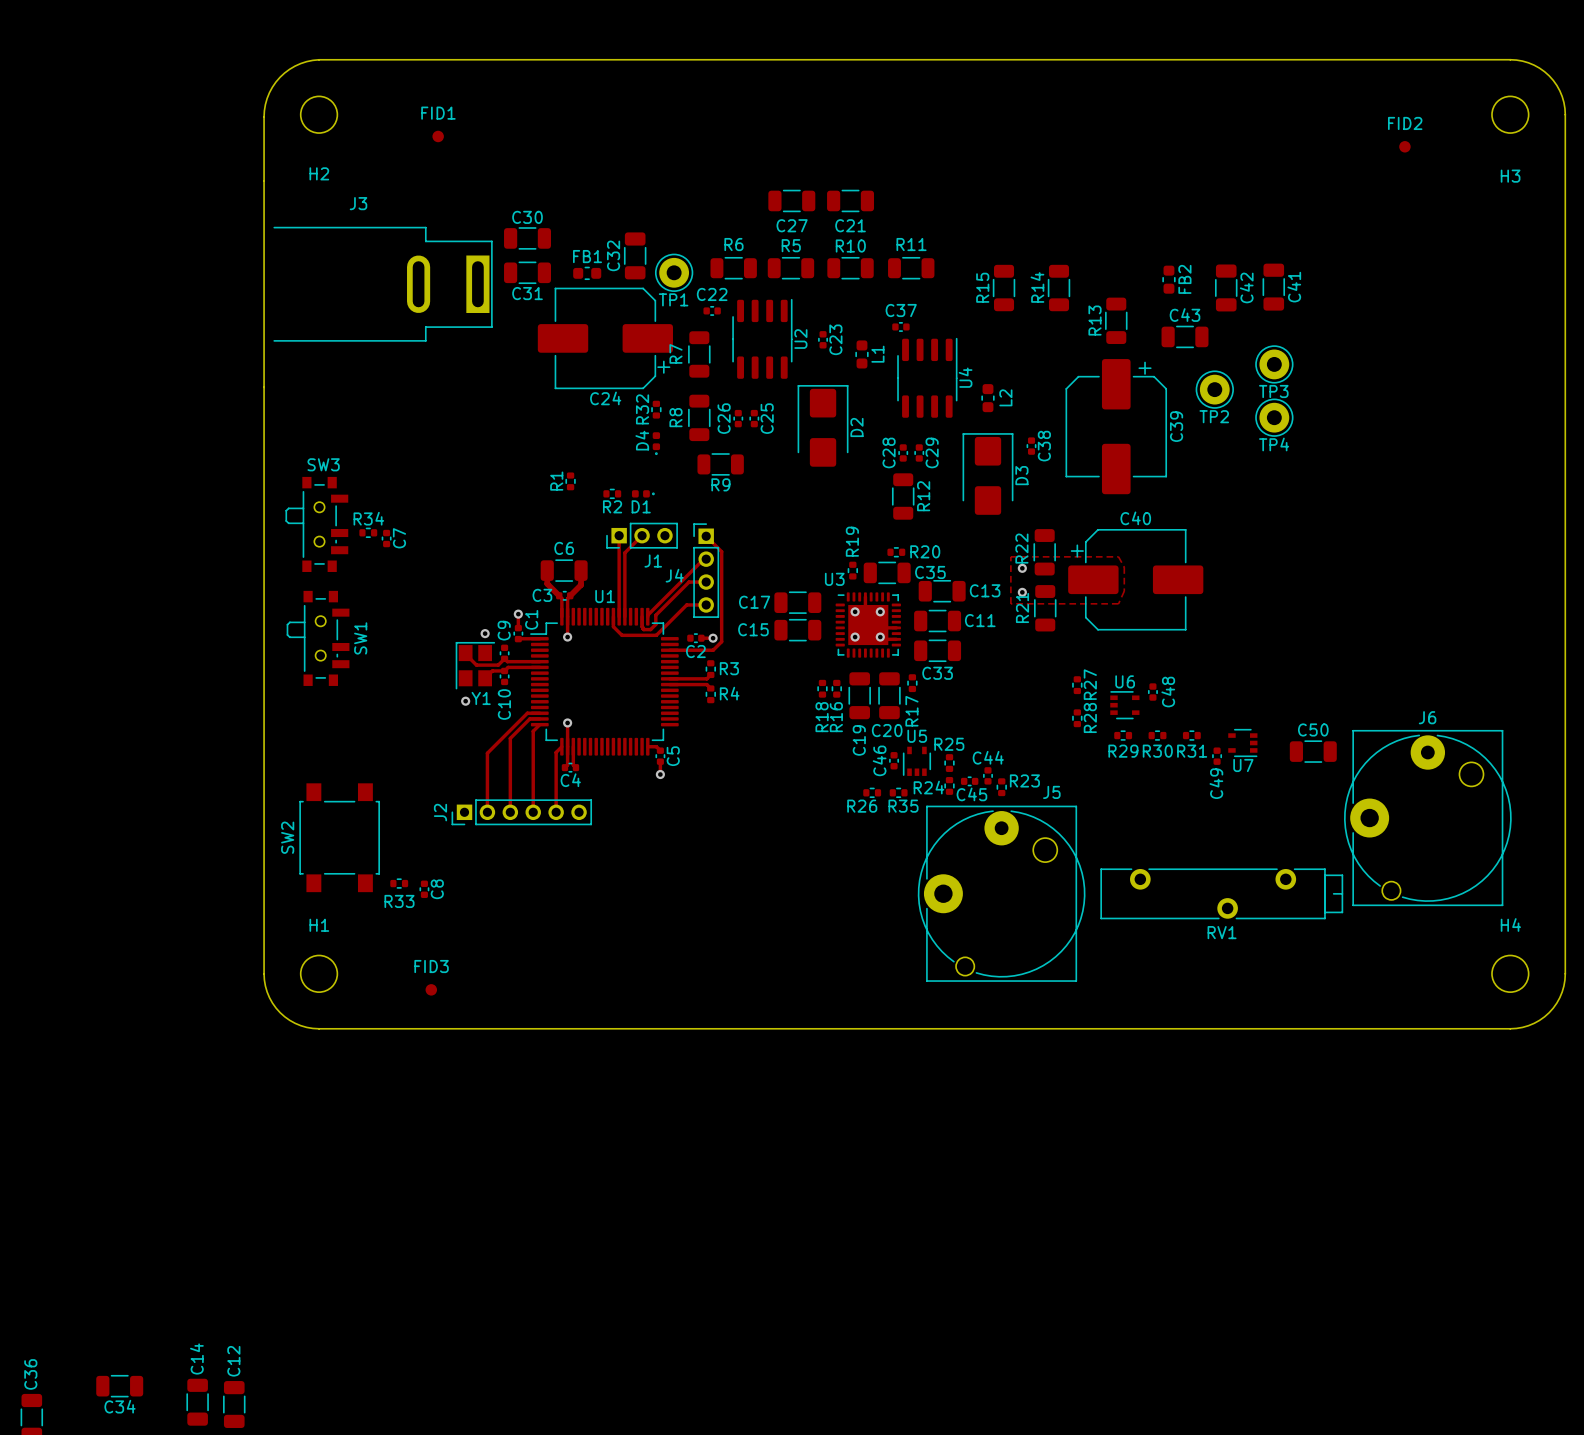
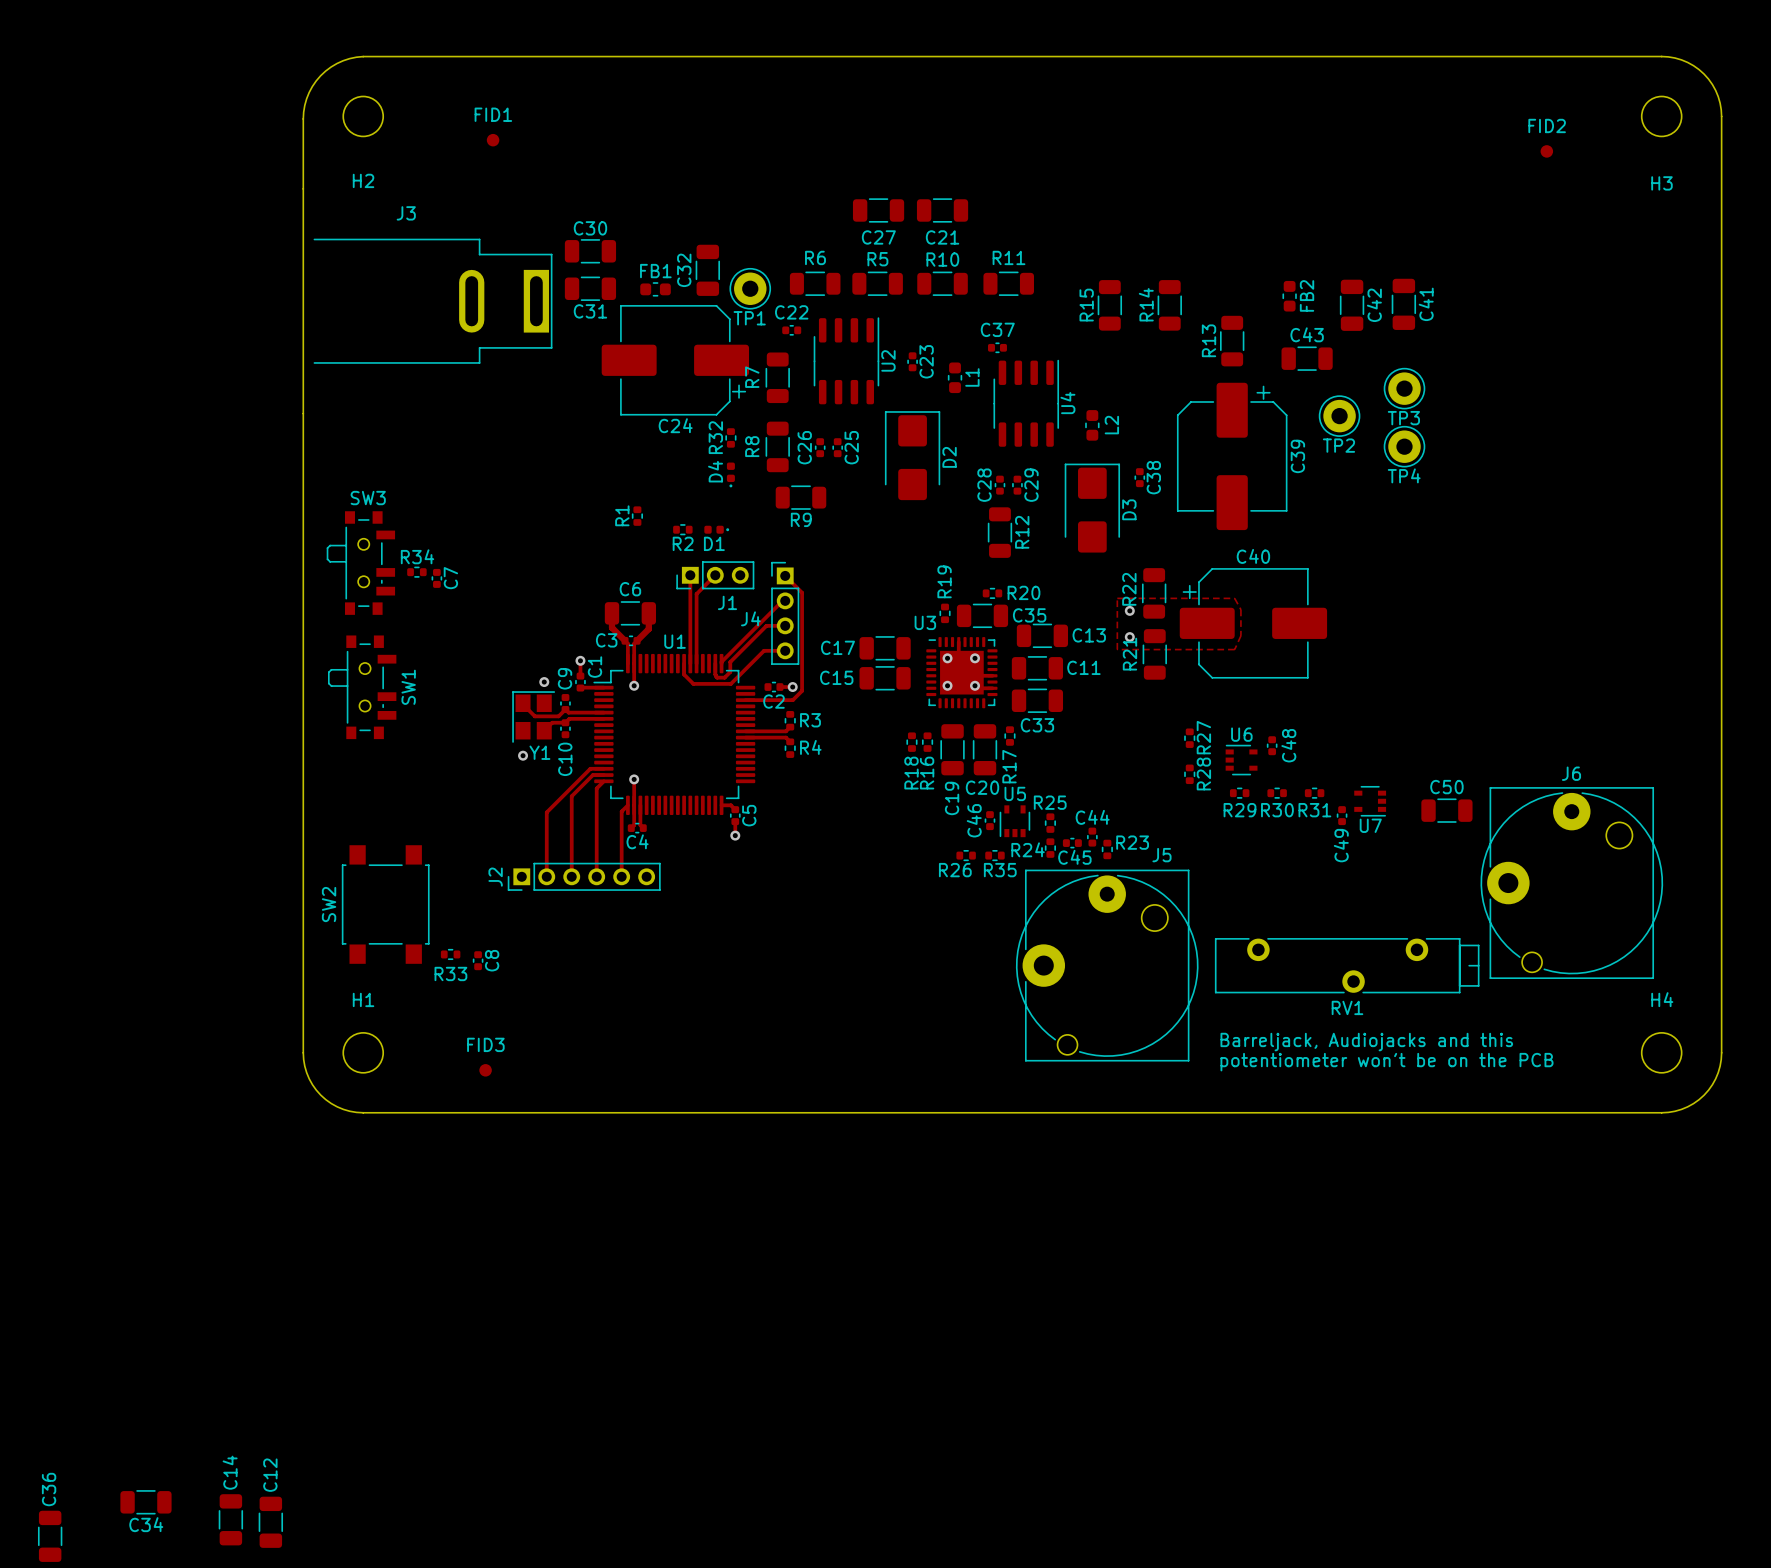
text: none -> Barreljack, Audiojacks and this (1366, 1042)
text: none -> potentiometer won't be on the PCB (1386, 1062)

